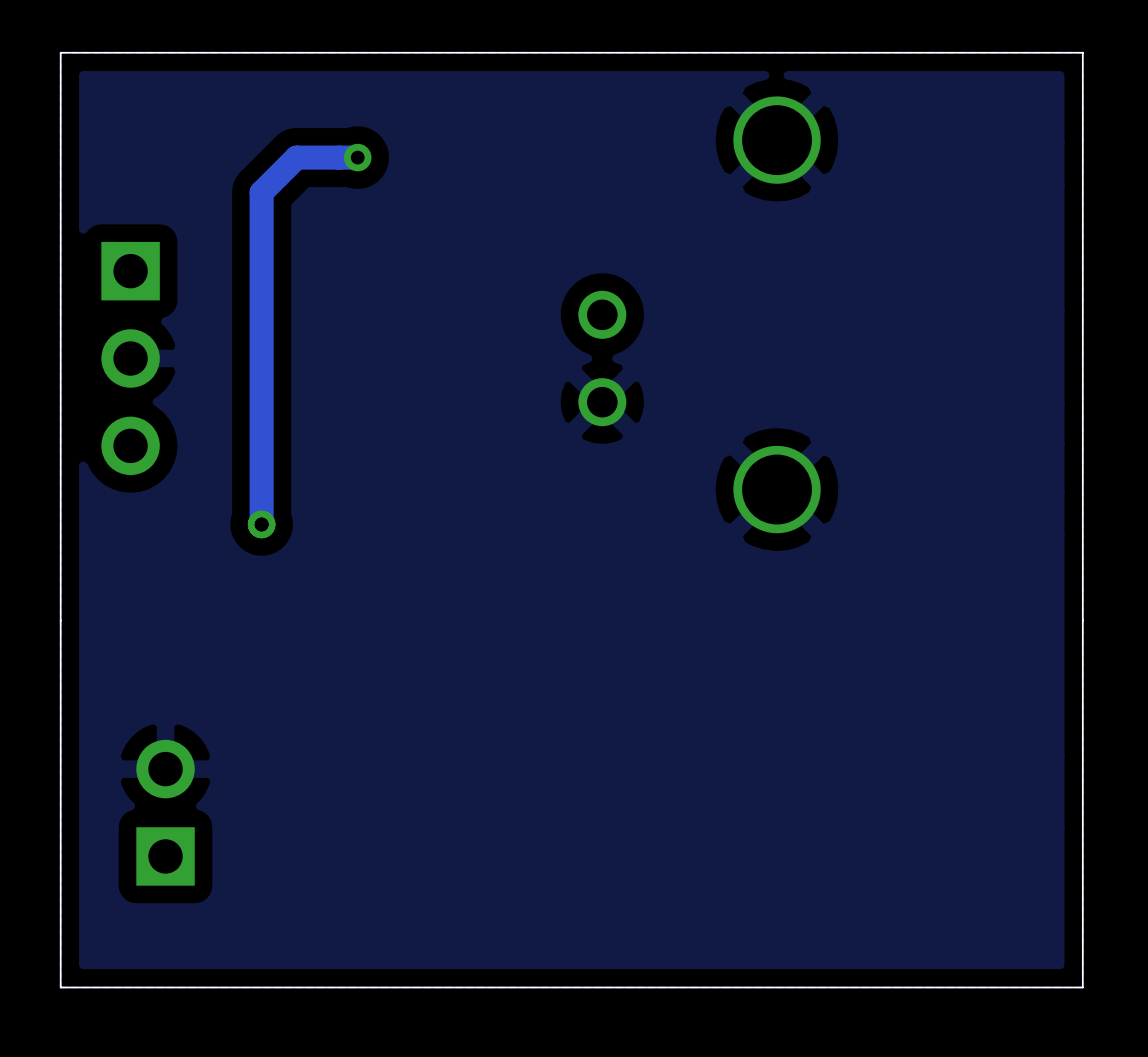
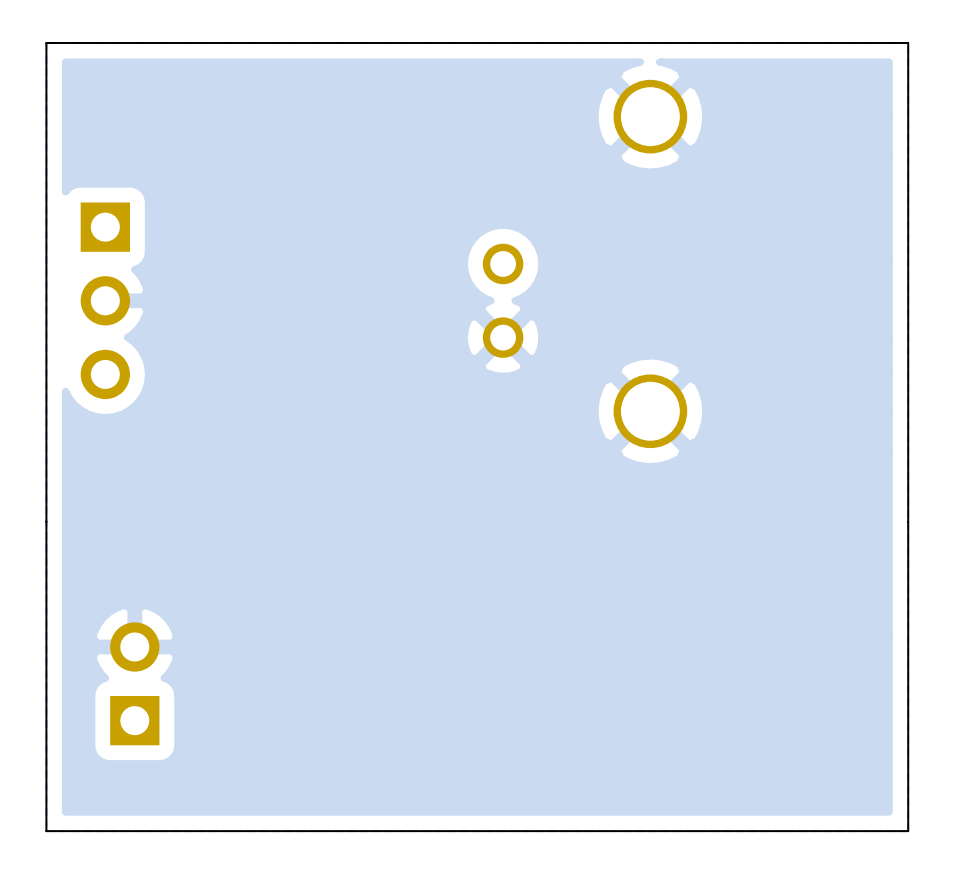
via: (357, 157) -> none
track: (261, 183) (287, 157) (357, 157) (296, 157) (261, 192) (261, 524) -> none
via: (261, 524) -> none

